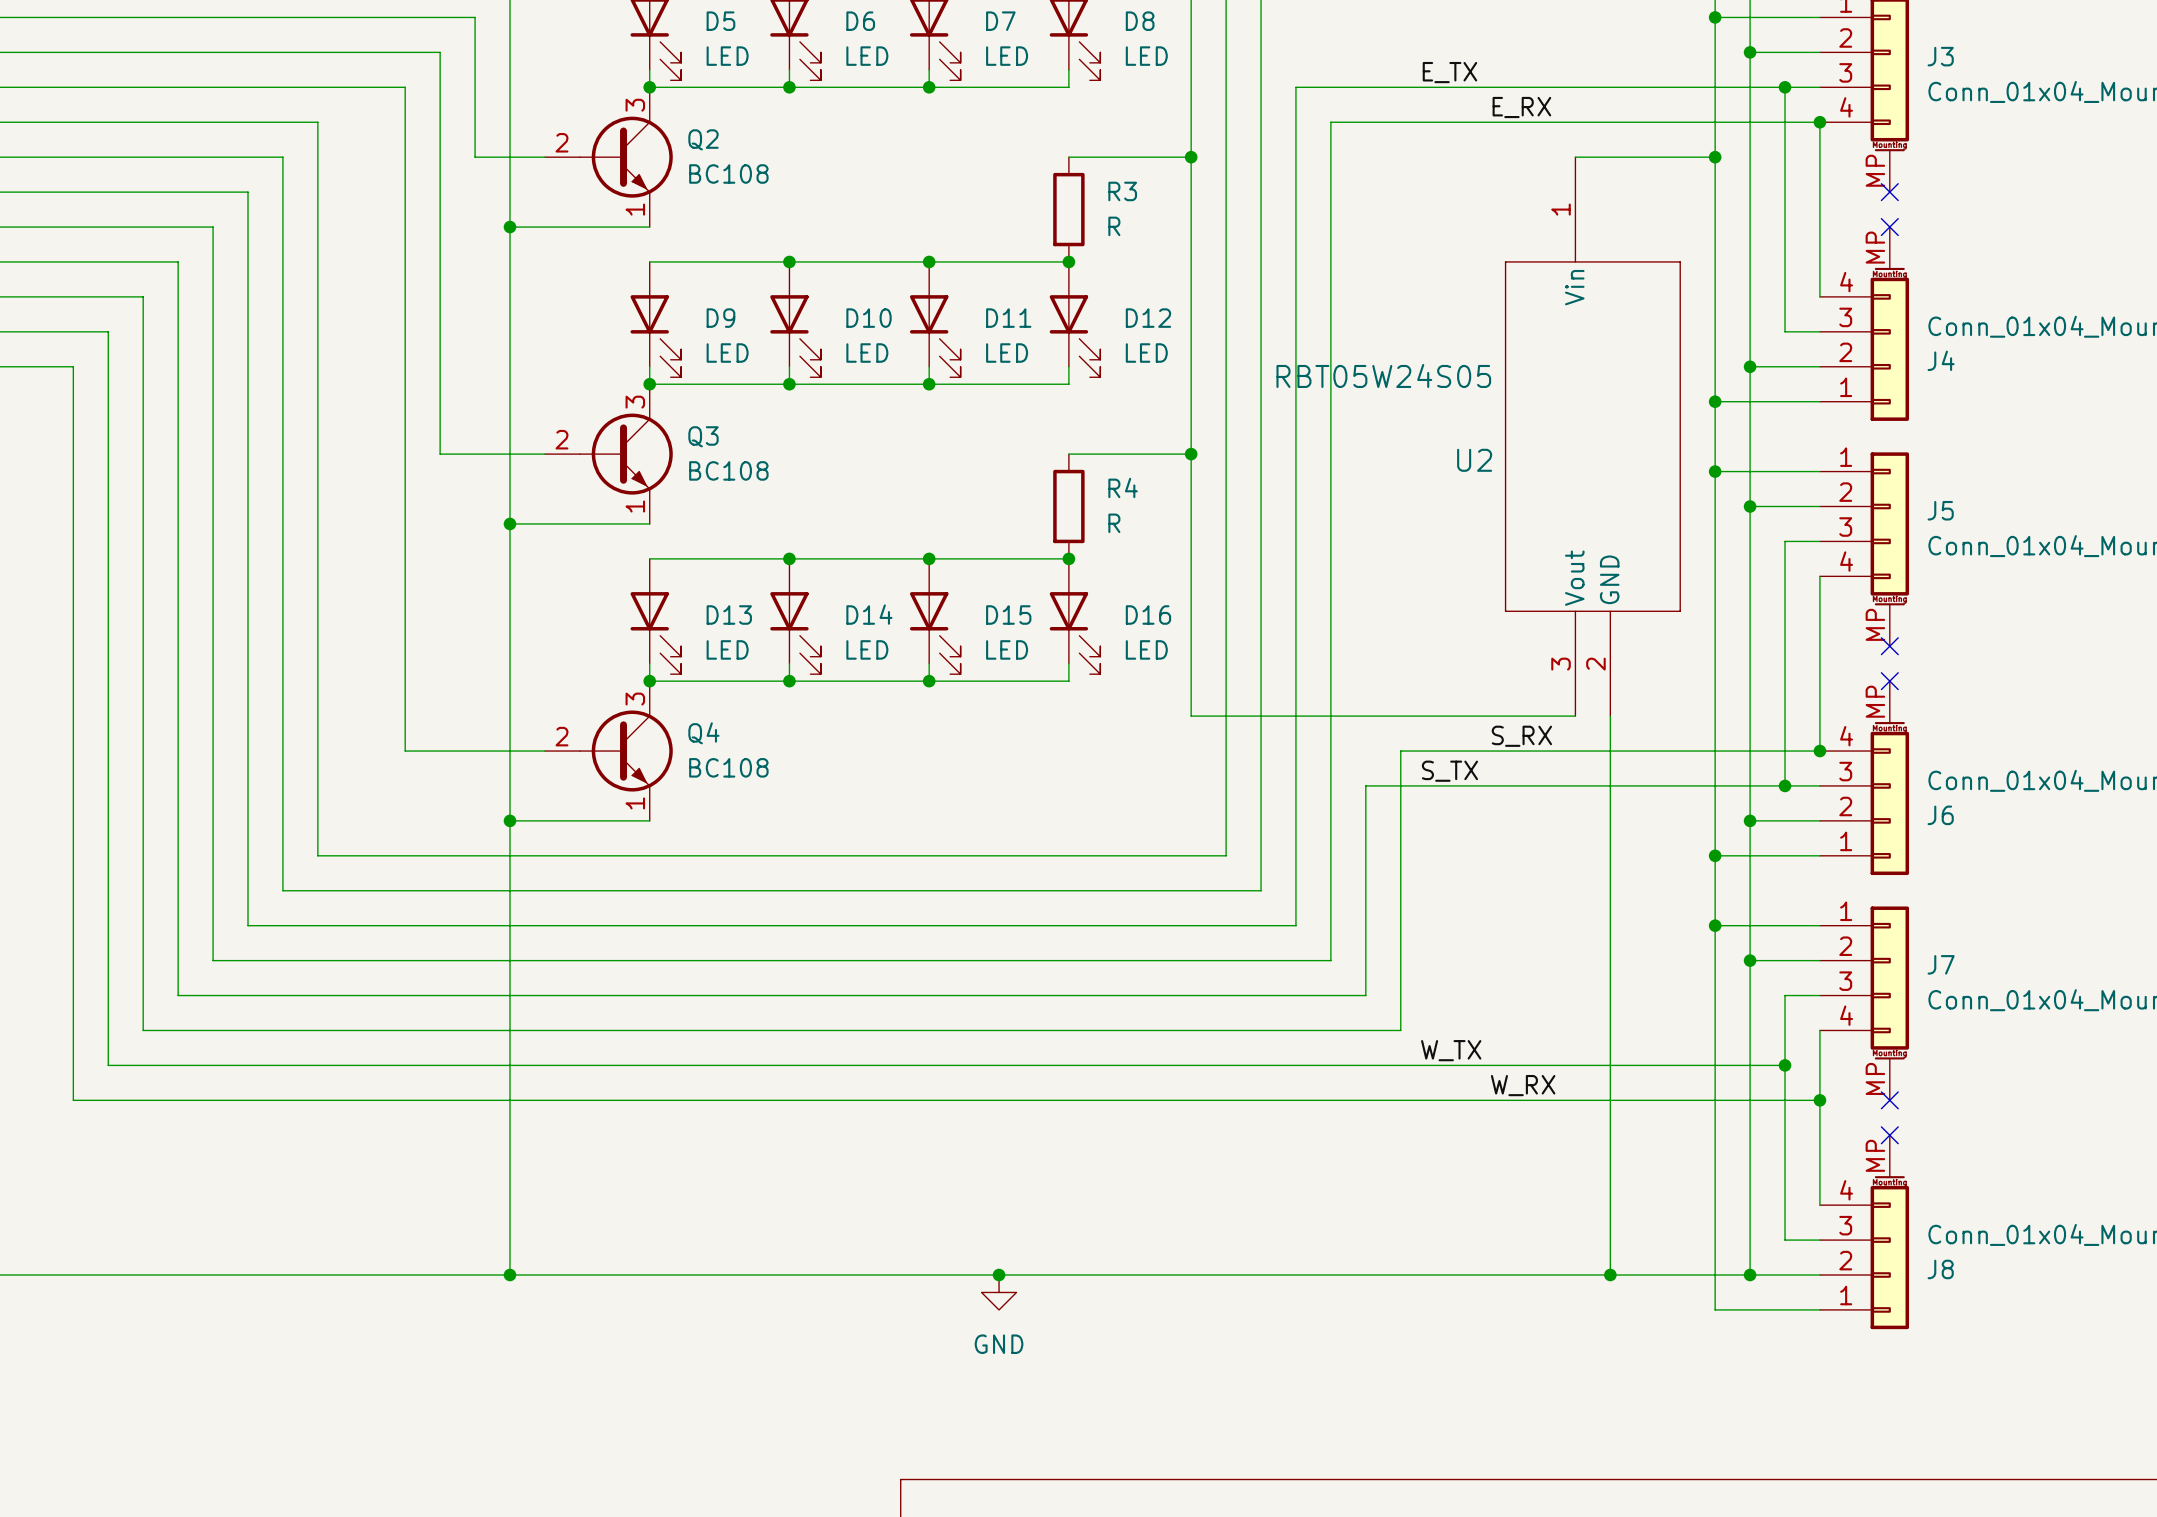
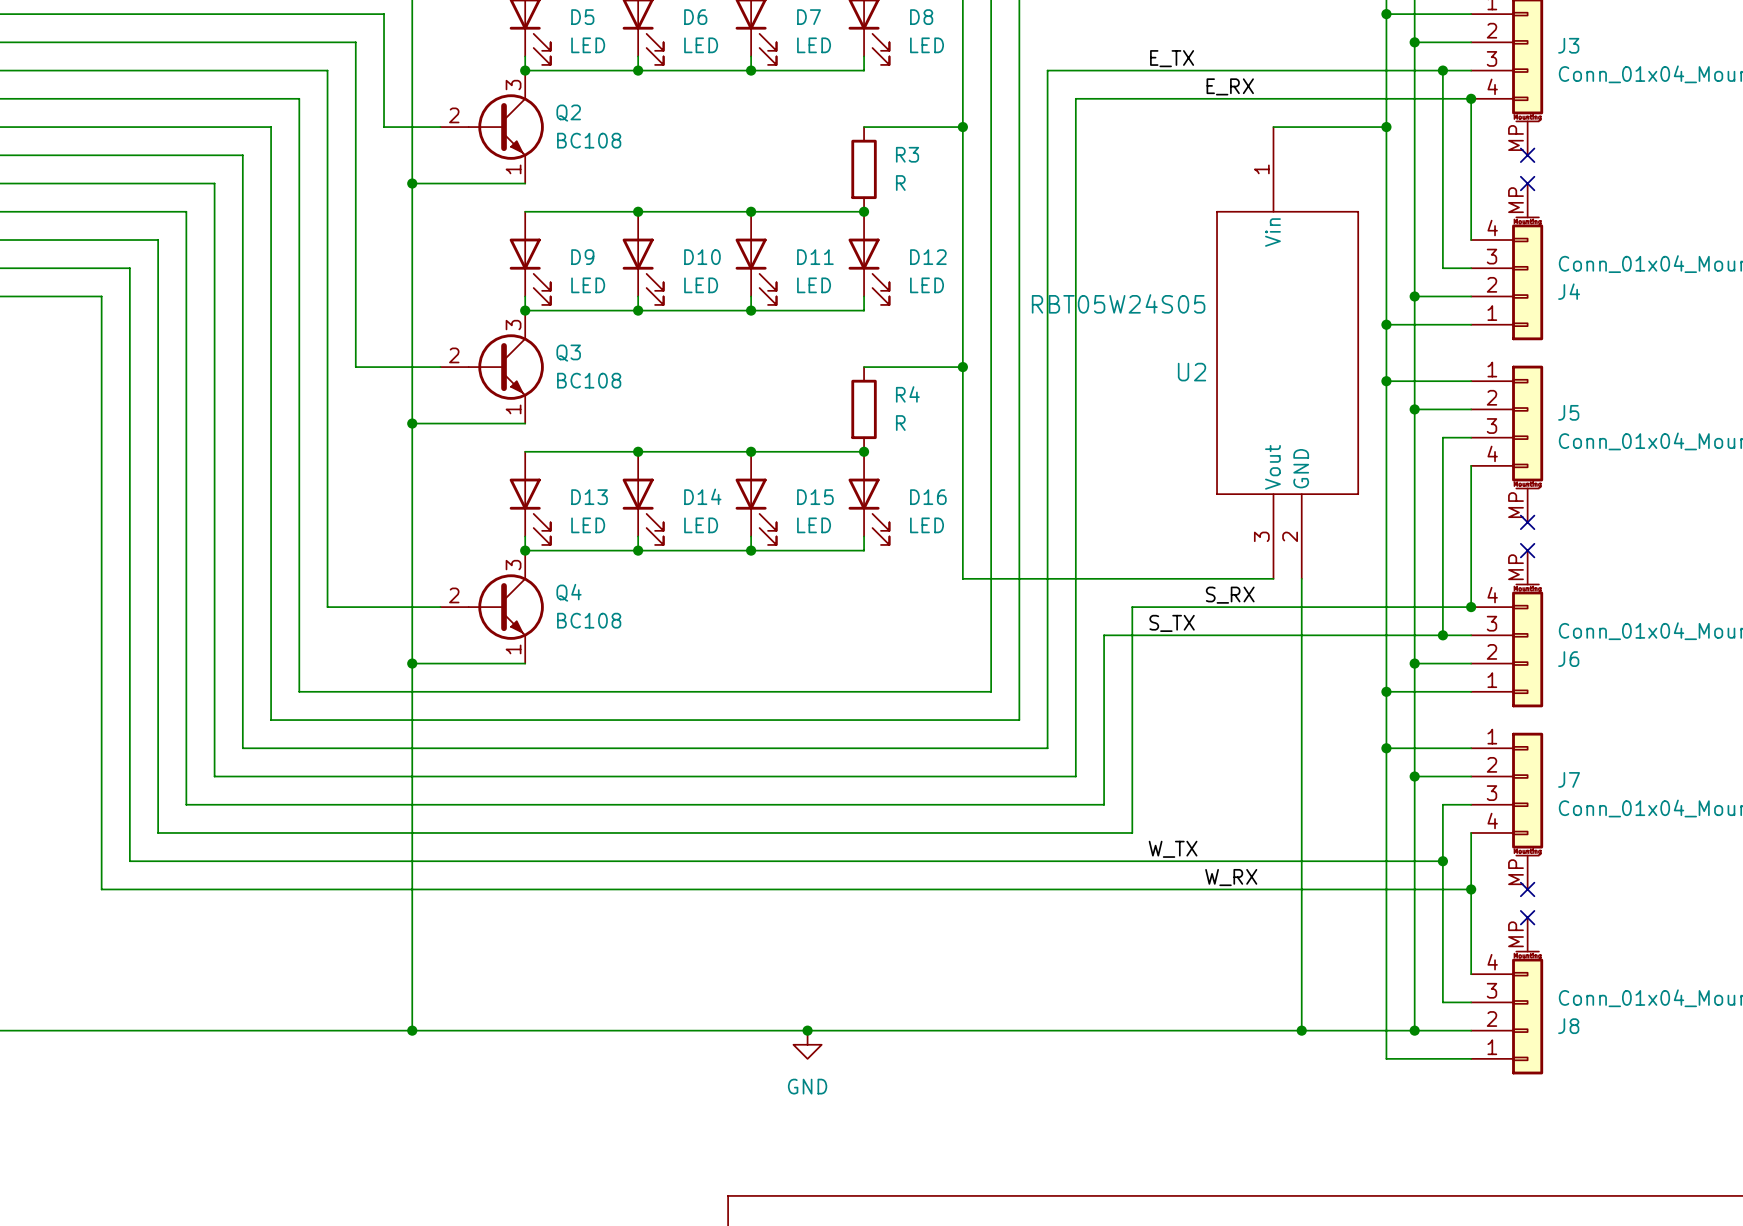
wire: (317, 122) (317, 855) (370, 855) -> (256, 98) (299, 98) (299, 691)
wire: (282, 157) (282, 890) (335, 890) -> (228, 127) (271, 127) (271, 720)
wire: (248, 192) (248, 925) (300, 925) -> (200, 155) (242, 155) (242, 748)
wire: (213, 227) (213, 960) (265, 960) -> (172, 183) (214, 183) (214, 776)
wire: (178, 261) (178, 995) (230, 995) -> (143, 211) (186, 211) (186, 804)
wire: (143, 296) (143, 1030) (195, 1030) -> (115, 240) (158, 240) (158, 832)
wire: (108, 331) (108, 1065) (160, 1065) -> (87, 268) (129, 268) (129, 861)
wire: (73, 366) (73, 1100) (125, 1100) -> (59, 296) (101, 296) (101, 889)

